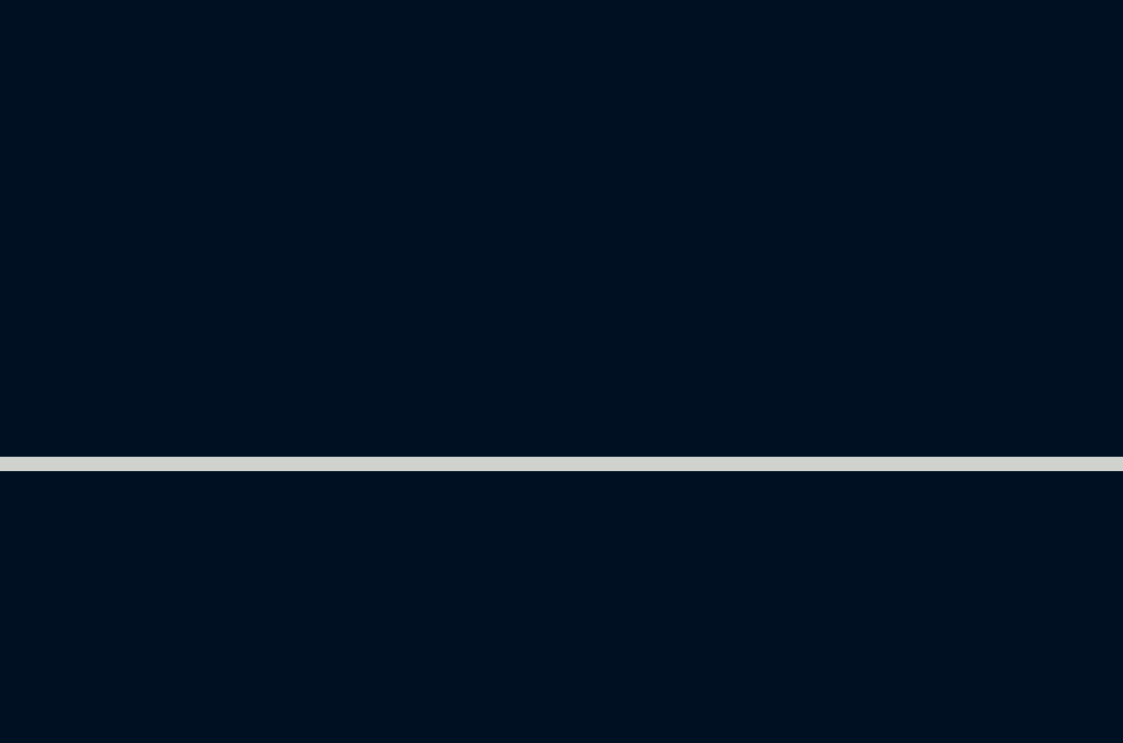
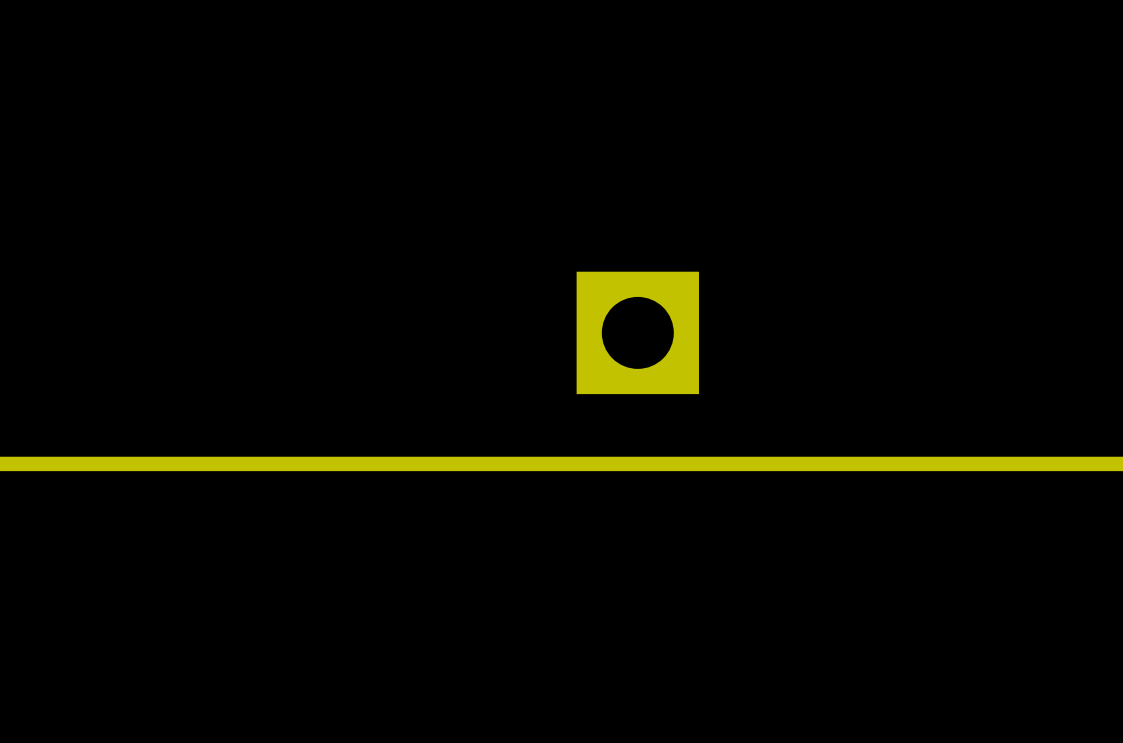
part: none -> (637, 332)

